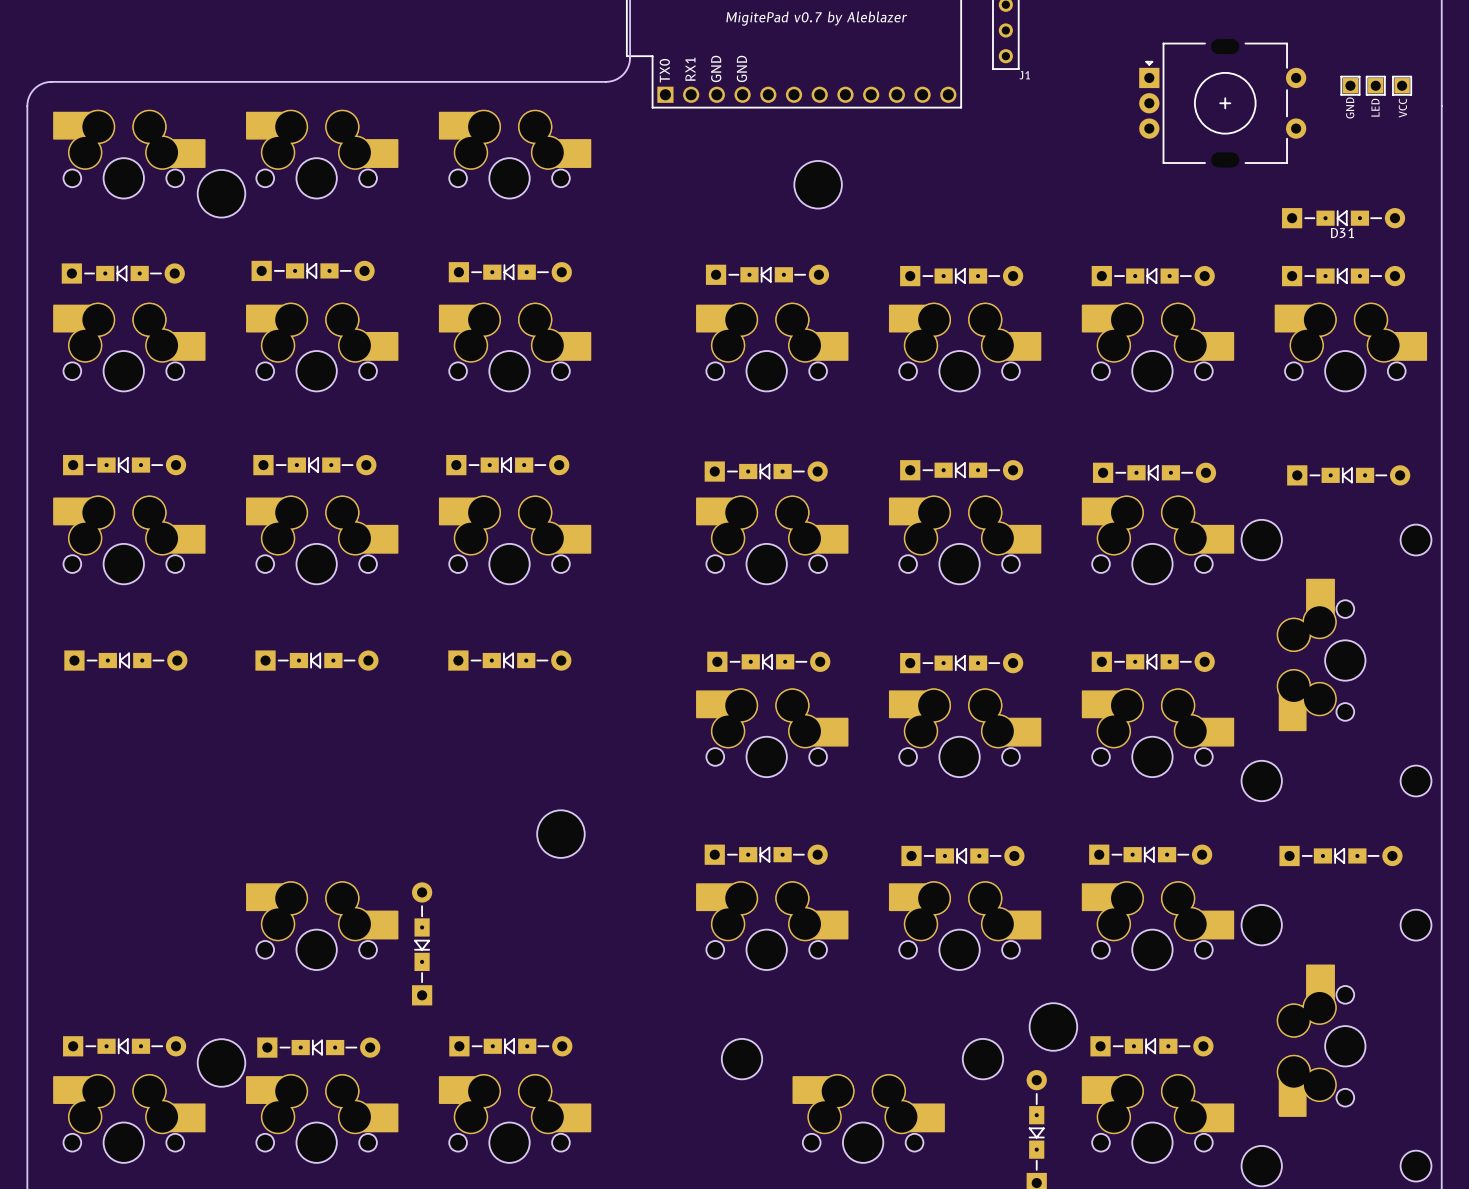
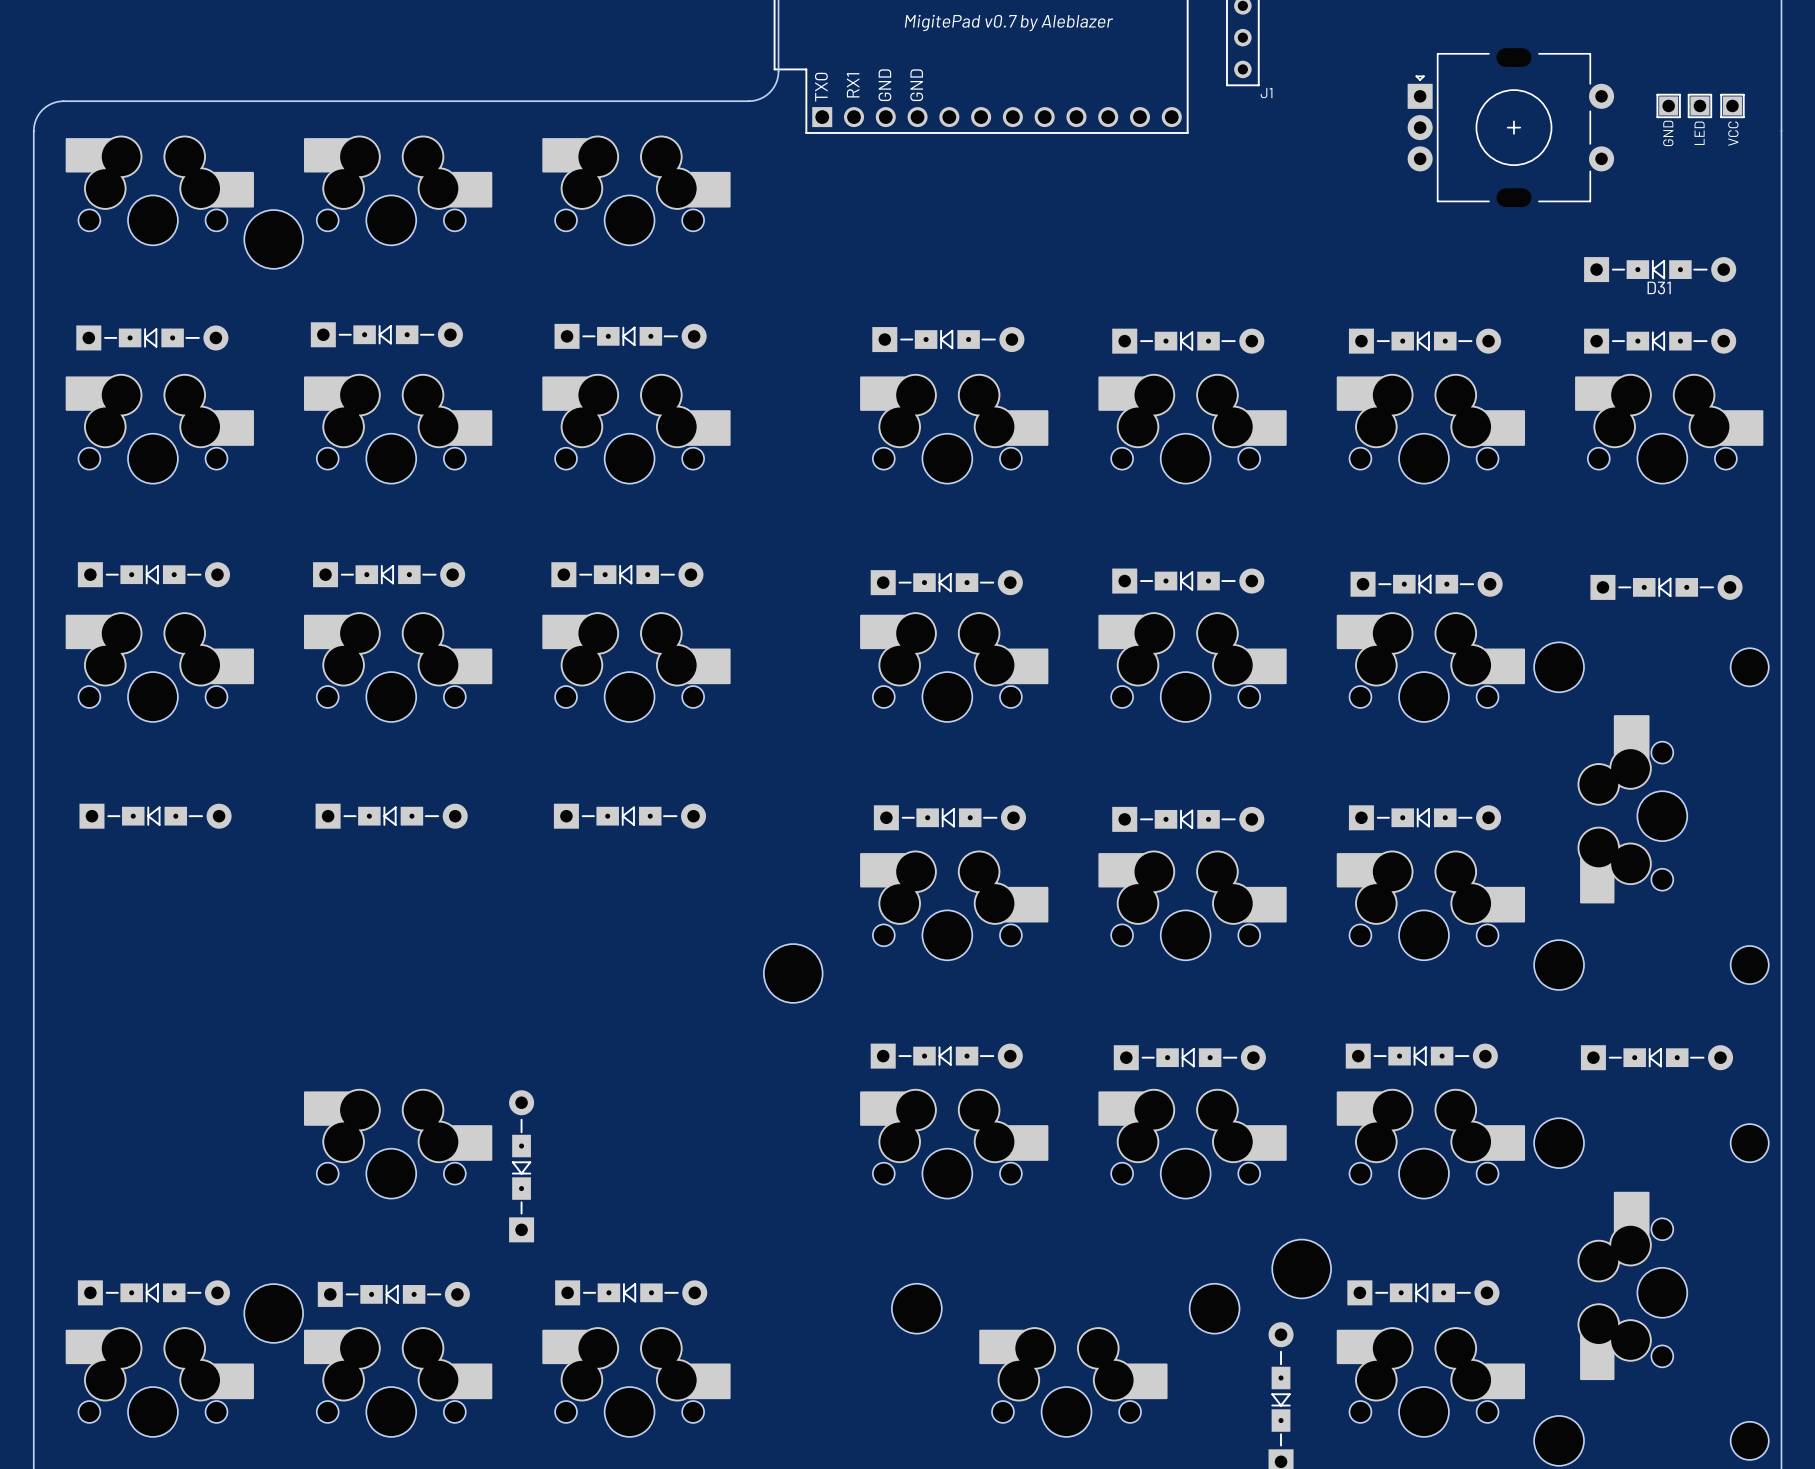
part: (818, 184) -> none
part position: (560, 834) -> (793, 973)

